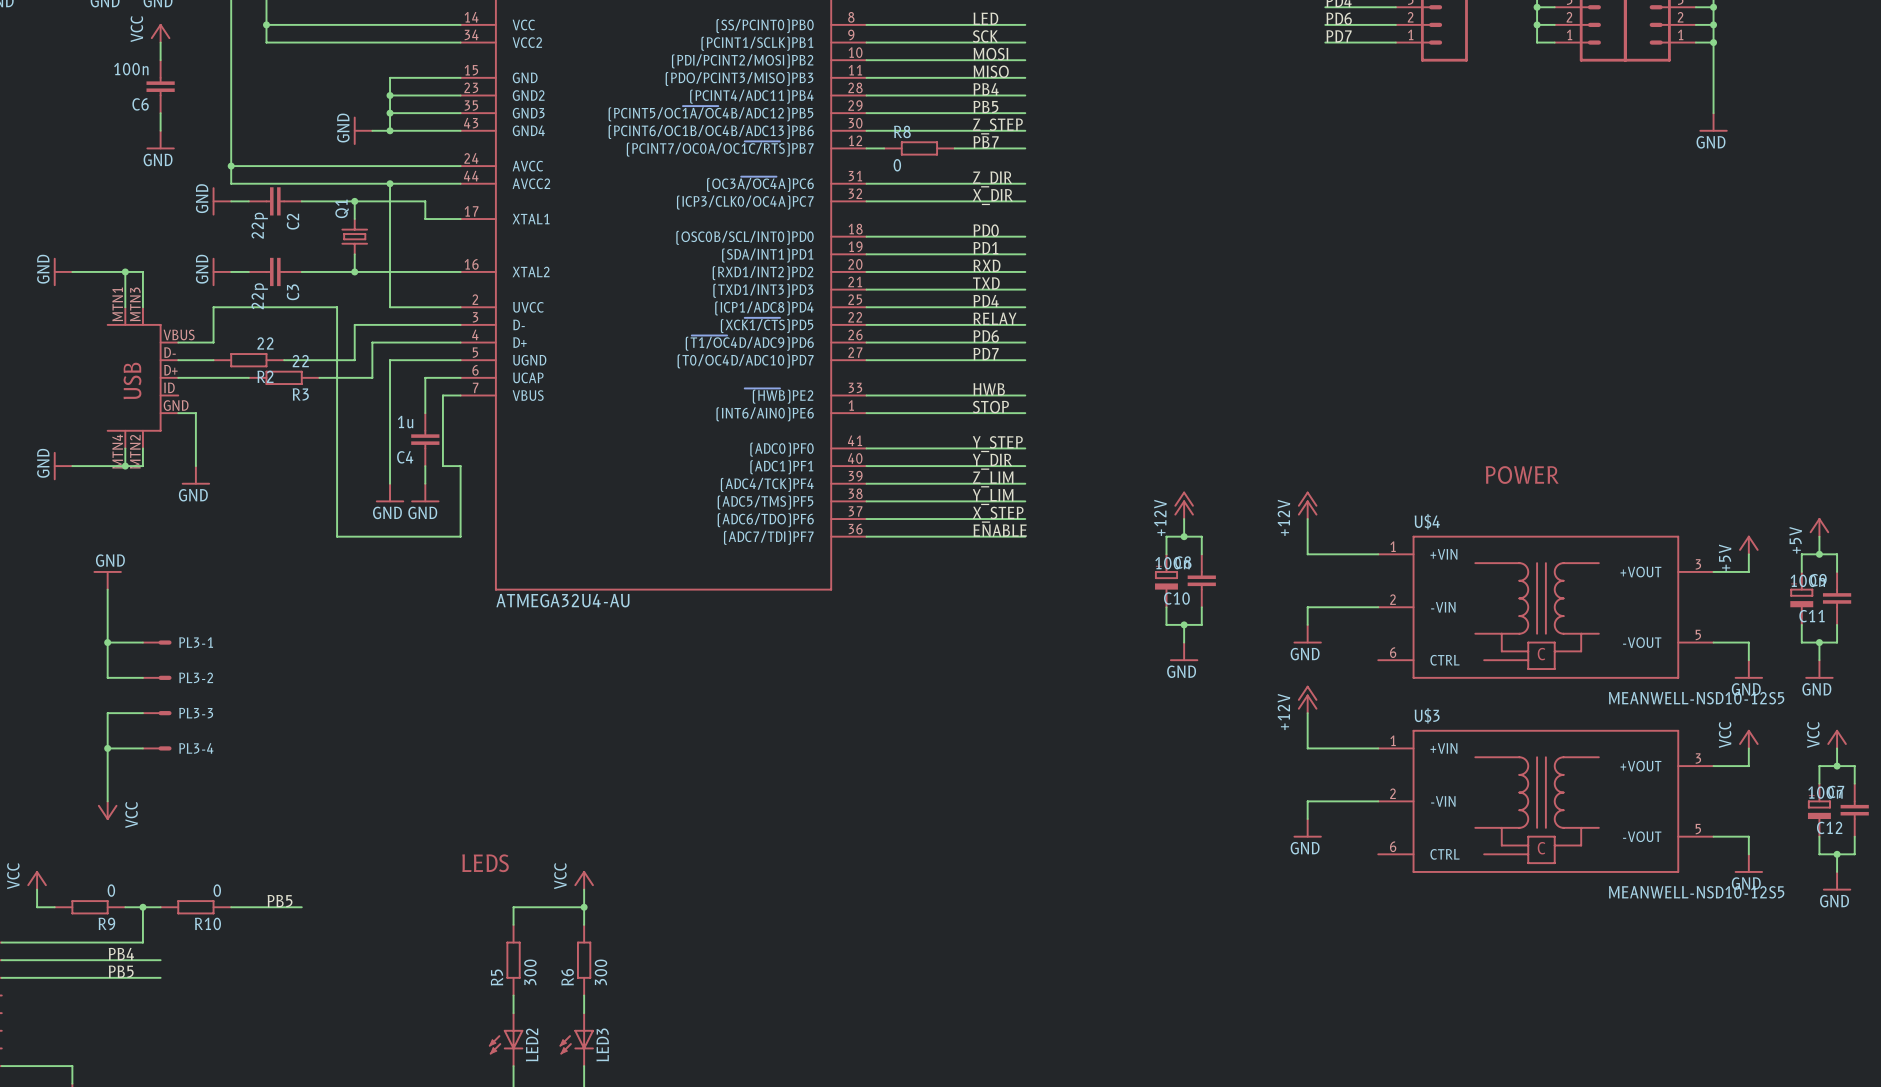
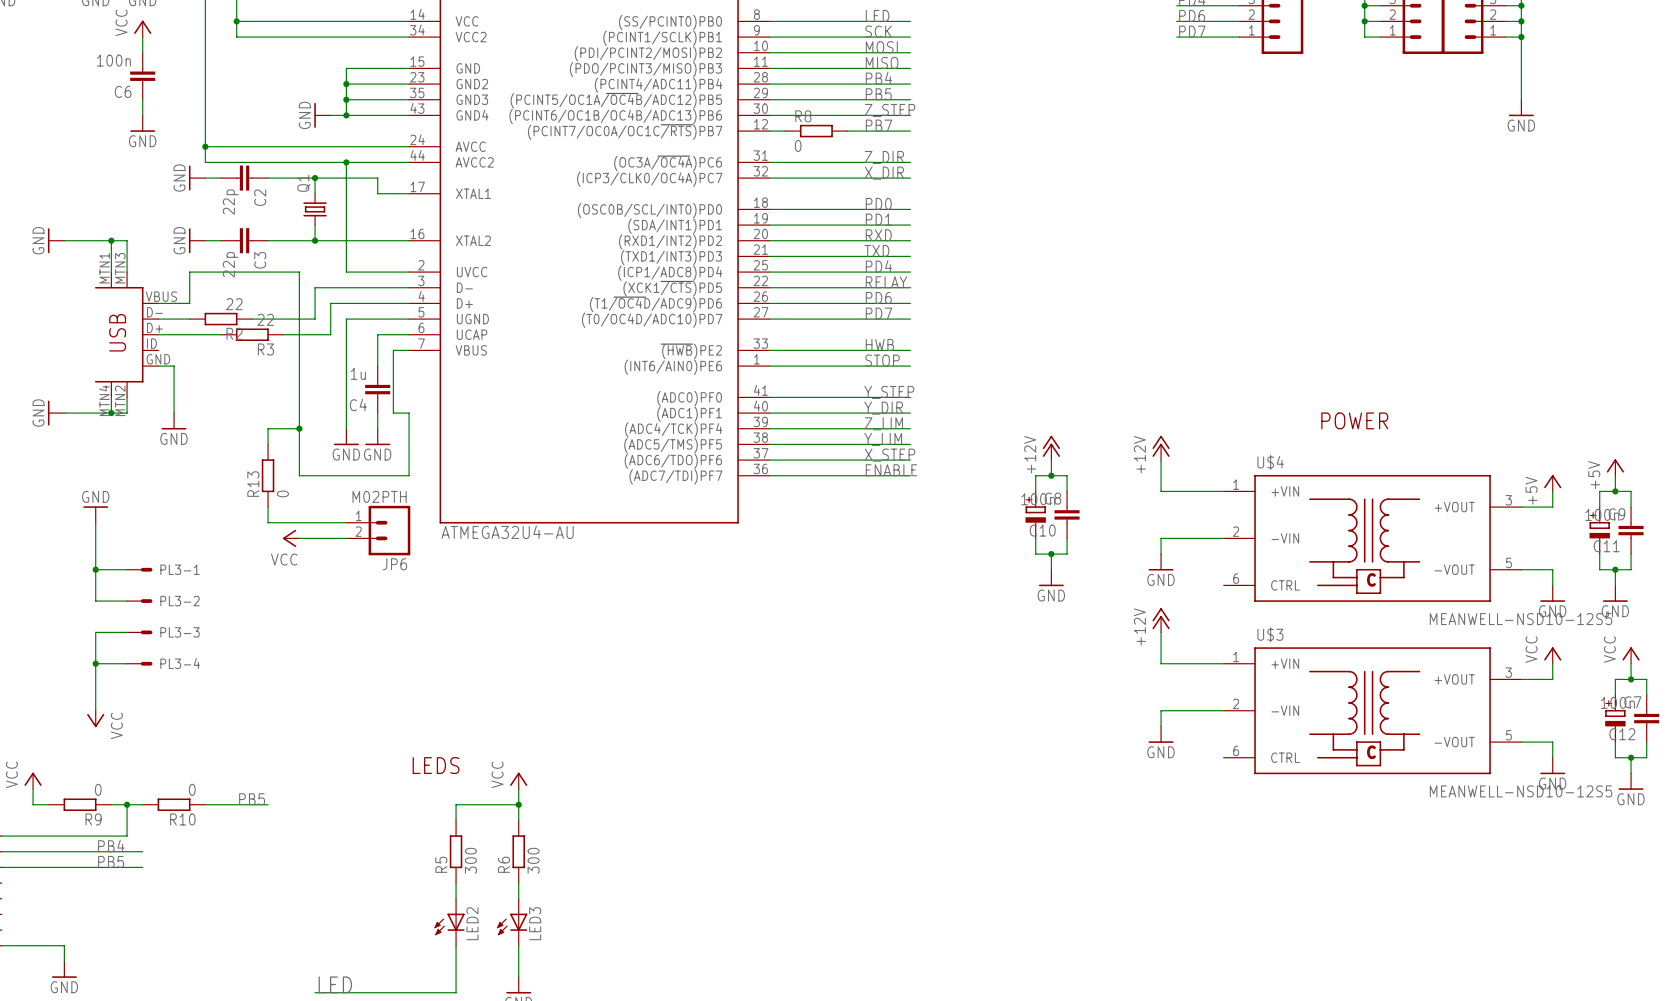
wire: none -> (299, 428) (268, 428) (268, 444)
junction: none -> (299, 428)
R13: none -> 0 (268, 475)
wire: none -> (268, 507) (268, 522) (346, 522)
JP6: none -> M02PTH (378, 530)
power symbol: none -> VCC (291, 538)
wire: none -> (299, 538) (346, 538)

